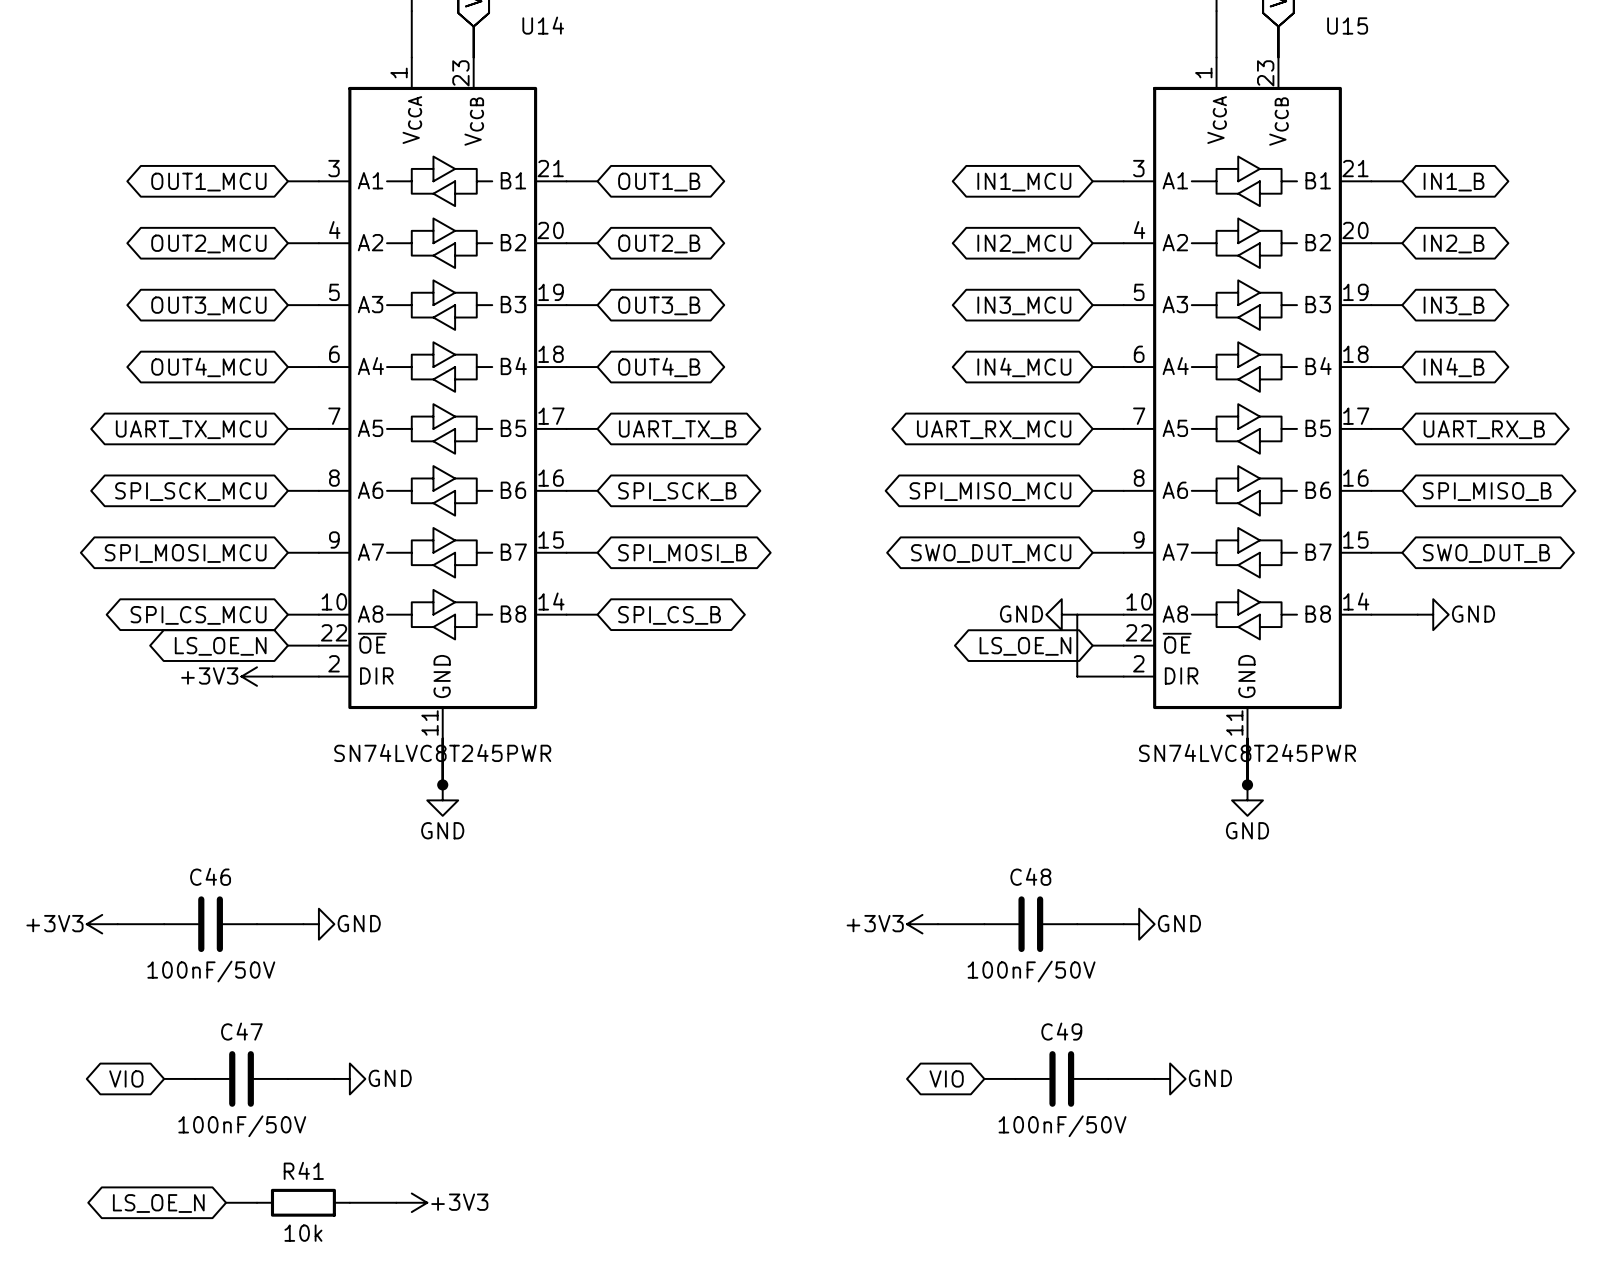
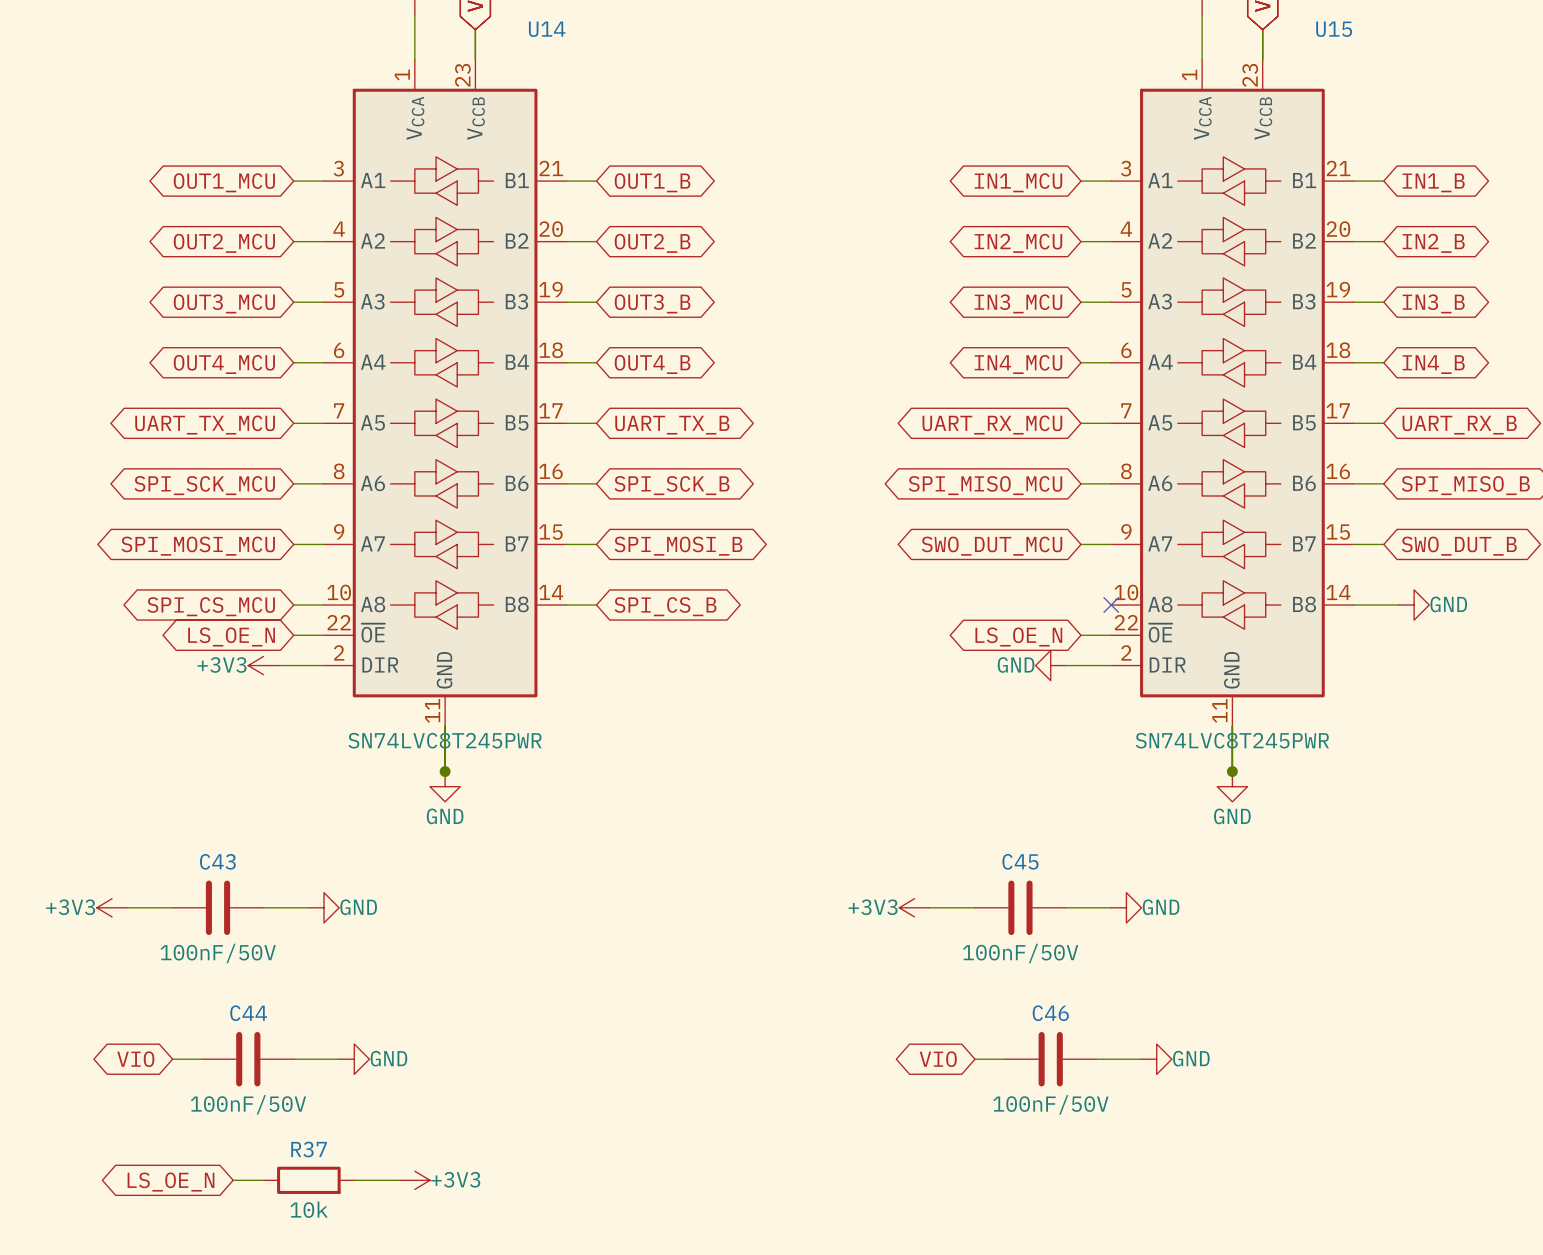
power symbol position: GND (1061, 614) -> GND (1050, 665)
wire: (1123, 614) (1077, 614) (1077, 676) -> none
no-connect mark: none -> (1111, 605)
C46 name: C46 (210, 876) -> C43 (217, 861)
C48 name: C48 (1030, 876) -> C45 (1020, 861)
C47 name: C47 (241, 1031) -> C44 (248, 1013)
C49 name: C49 (1061, 1031) -> C46 (1050, 1013)
R41 name: R41 (303, 1170) -> R37 (309, 1149)

